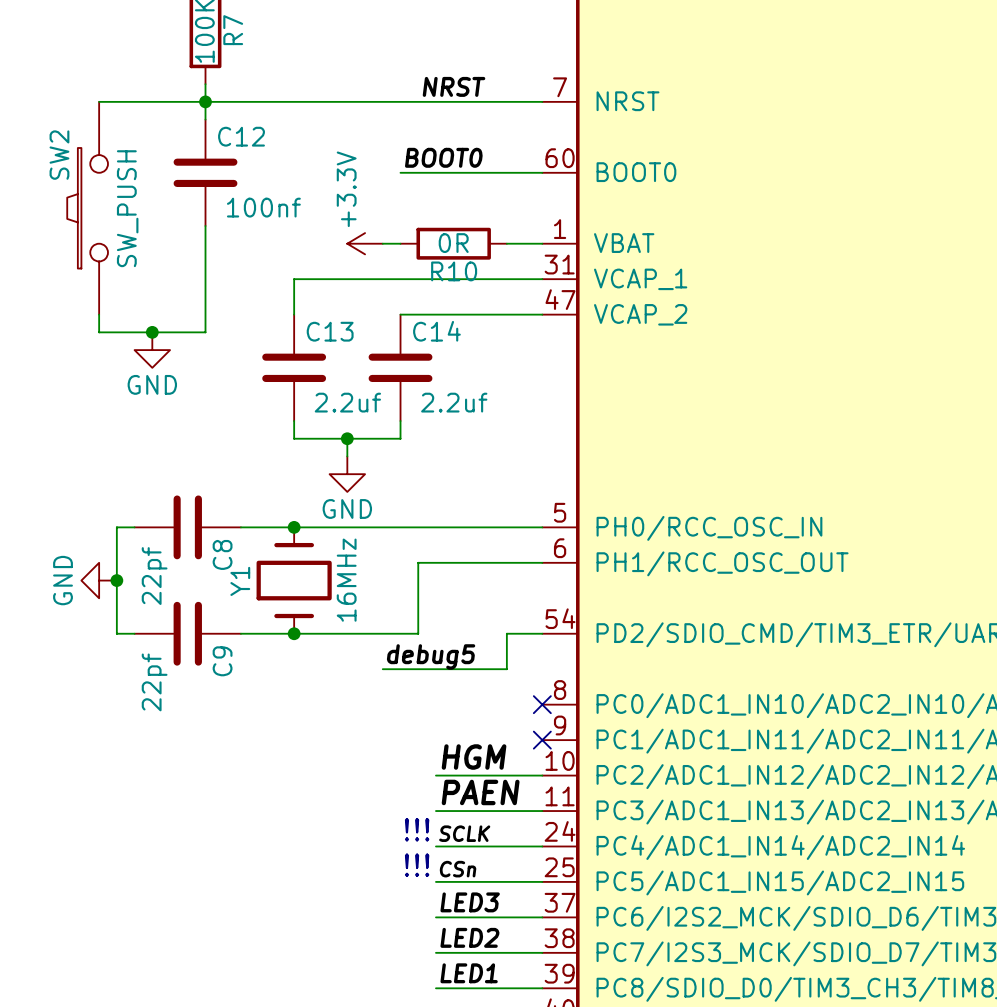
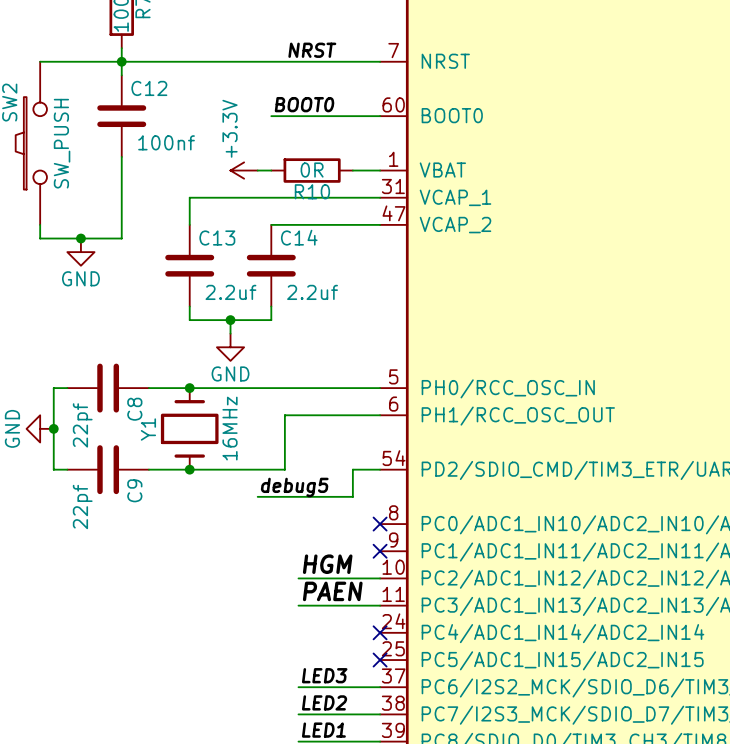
text: !!! (417, 829) -> none
label: SCLK (464, 833) -> none
wire: (435, 846) (542, 846) -> none
no-connect mark: none -> (380, 632)
text: !!! (417, 865) -> none
label: CSn (458, 869) -> none
wire: (435, 881) (542, 881) -> none
no-connect mark: none -> (380, 660)

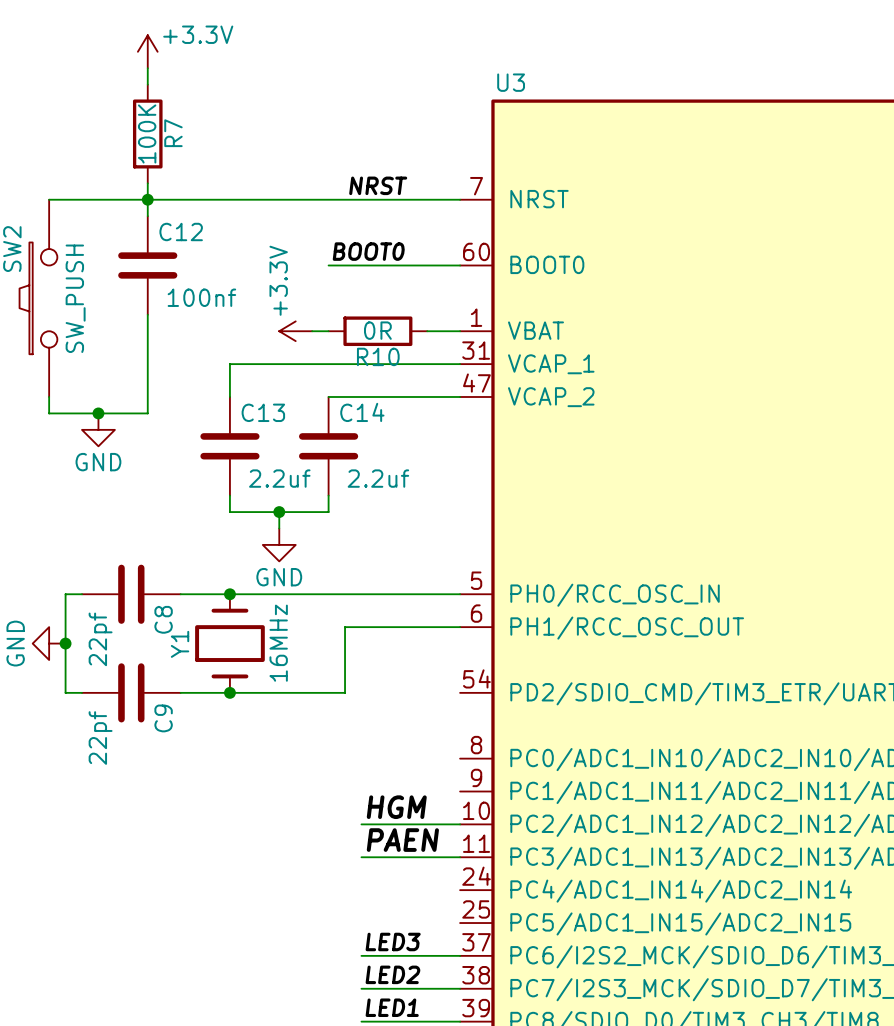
wire: (380, 469) (352, 469) (352, 496) (257, 496) -> none
label: debug5 (294, 487) -> none
no-connect mark: (380, 524) -> none
no-connect mark: (380, 551) -> none
no-connect mark: (380, 632) -> none
no-connect mark: (380, 660) -> none

